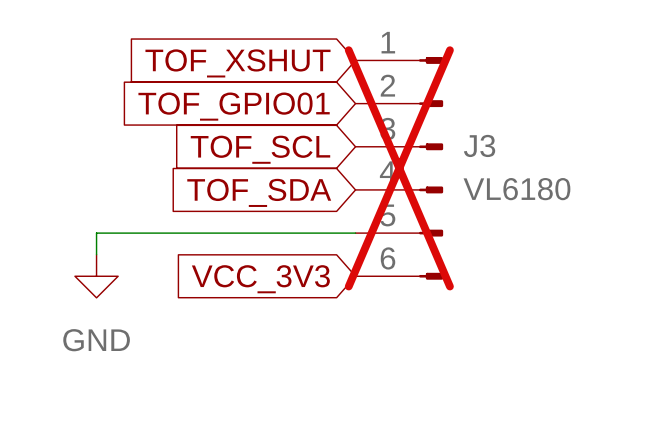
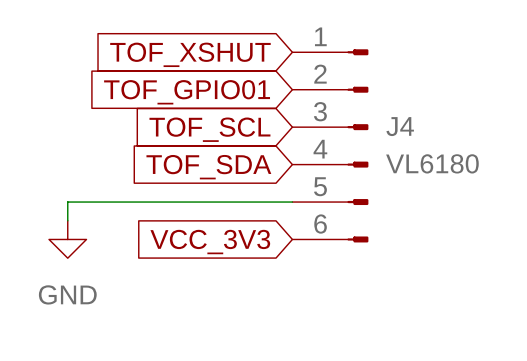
J3 name: J3 (479, 145) -> J4 (400, 126)
J3 do-not-place cross: (399, 168) -> none

